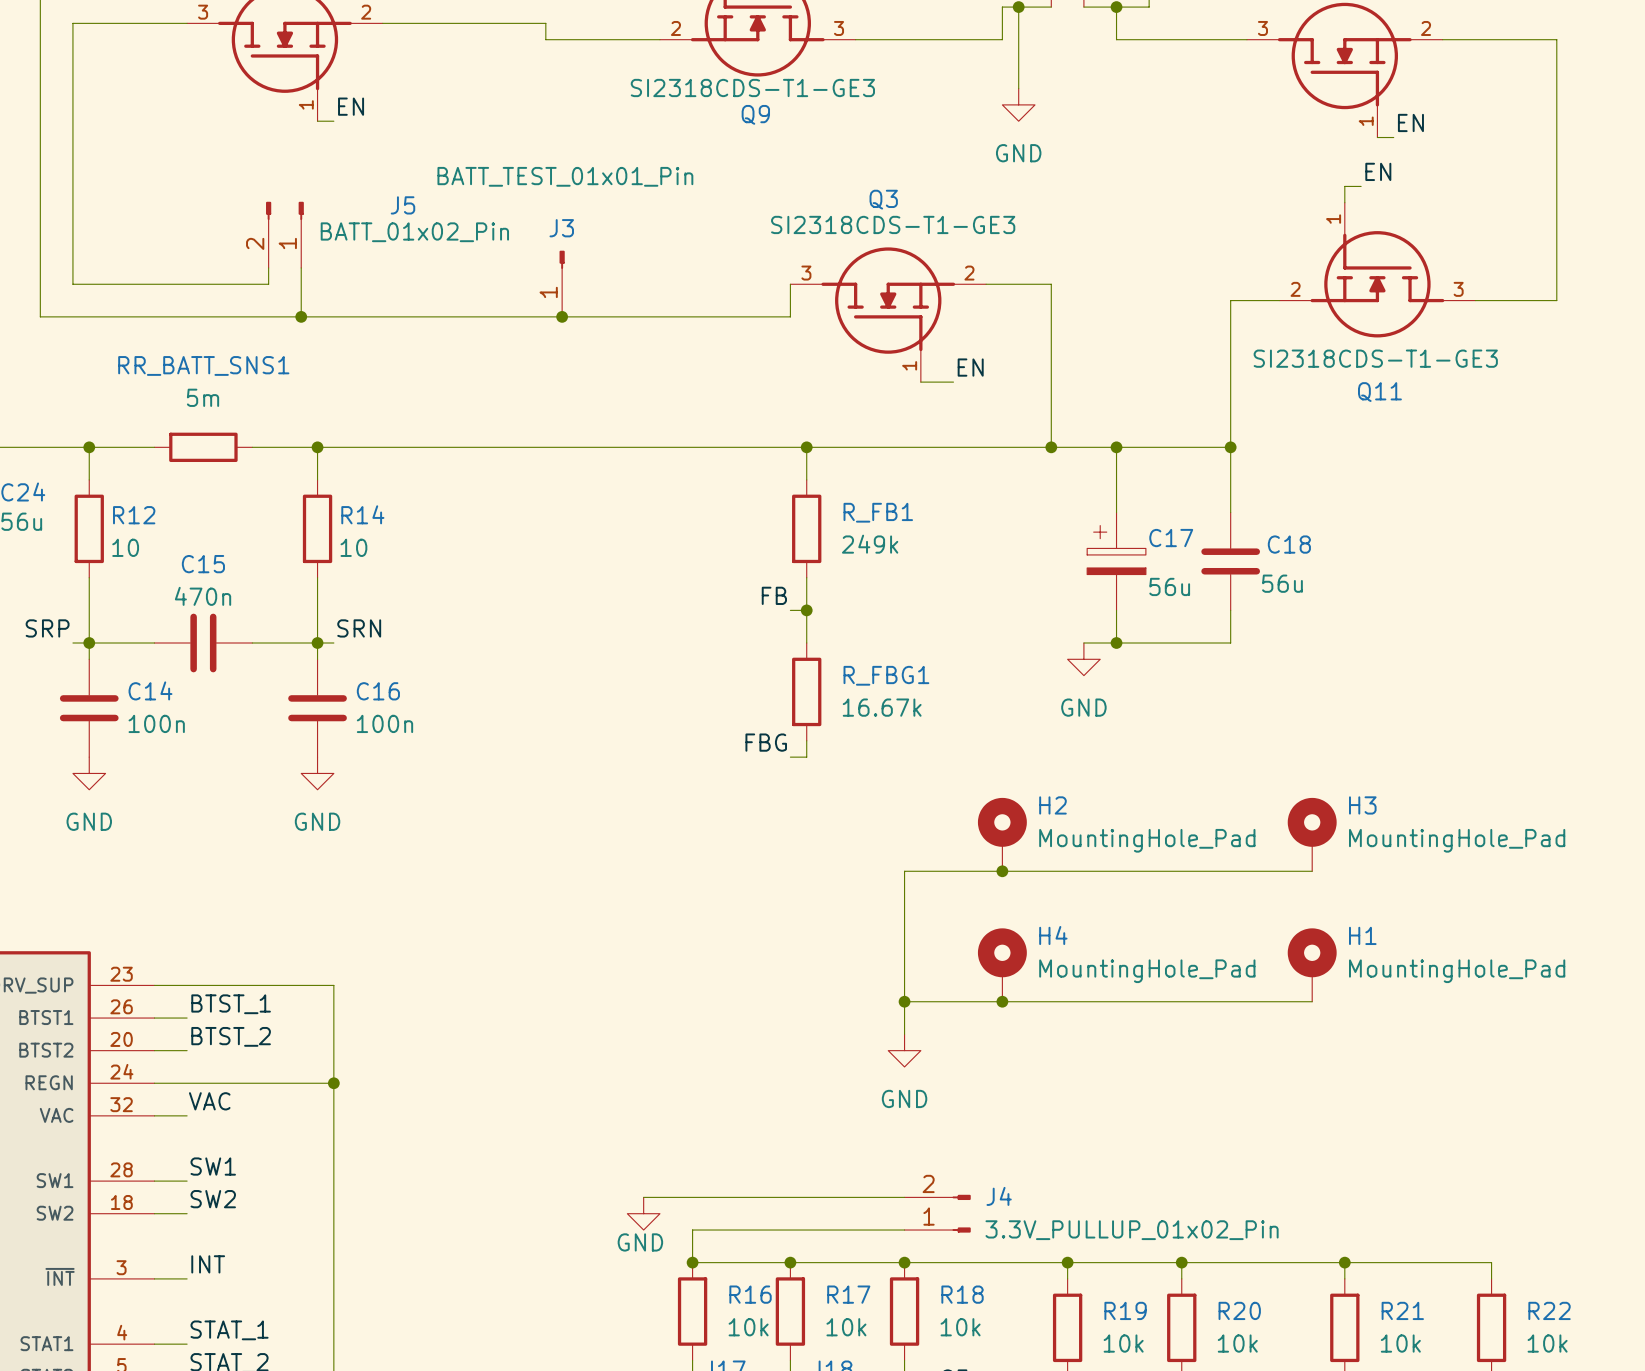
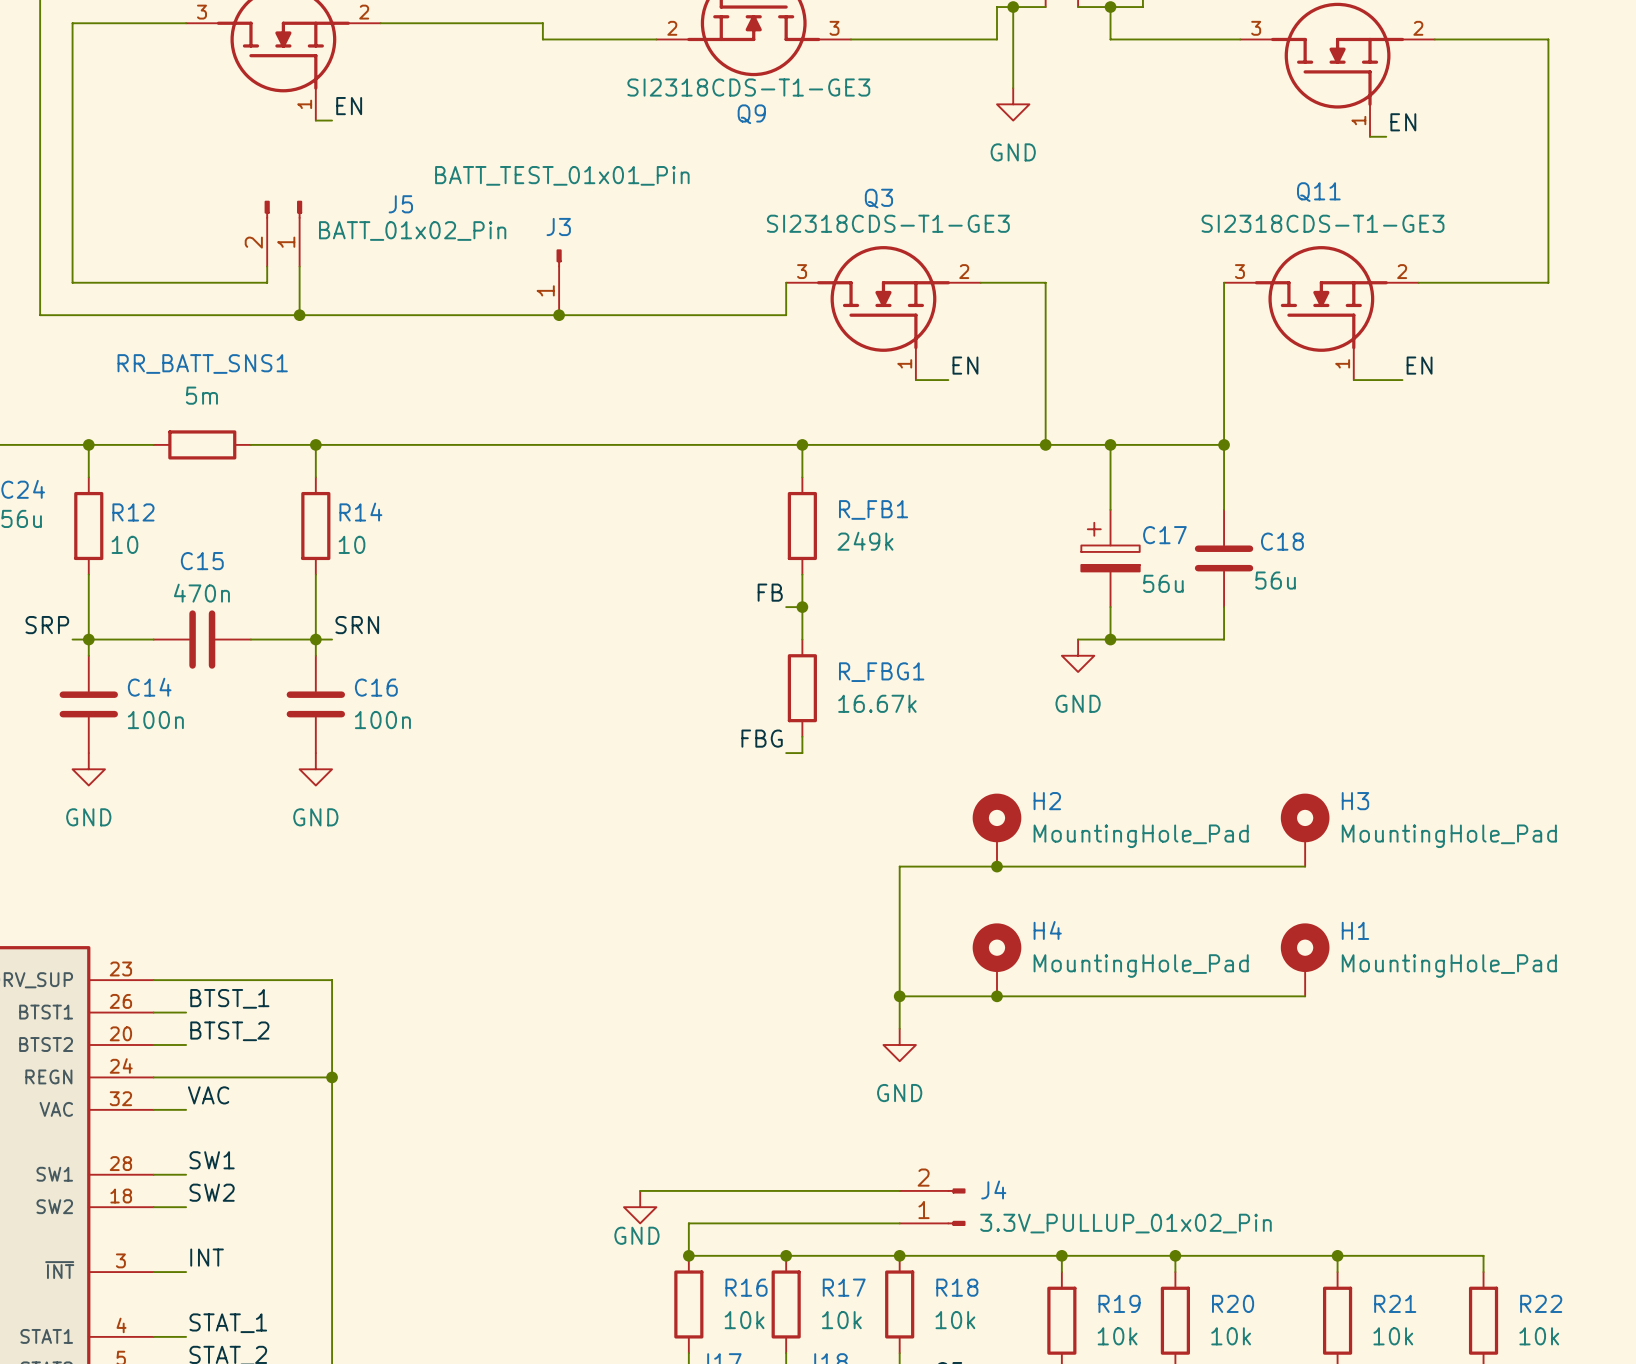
label position: EN (1378, 171) -> EN (1419, 365)
wire: (1361, 186) (1344, 186) (1344, 202) -> none
Q11 rotation: 0° (1377, 284) -> 180° (1321, 298)
wire: (1556, 284) (1556, 300) (1475, 300) -> (1548, 282) (1418, 282)
wire: (1230, 300) (1279, 300) -> (1224, 298) (1224, 282)
wire: none -> (1353, 380) (1402, 380)

